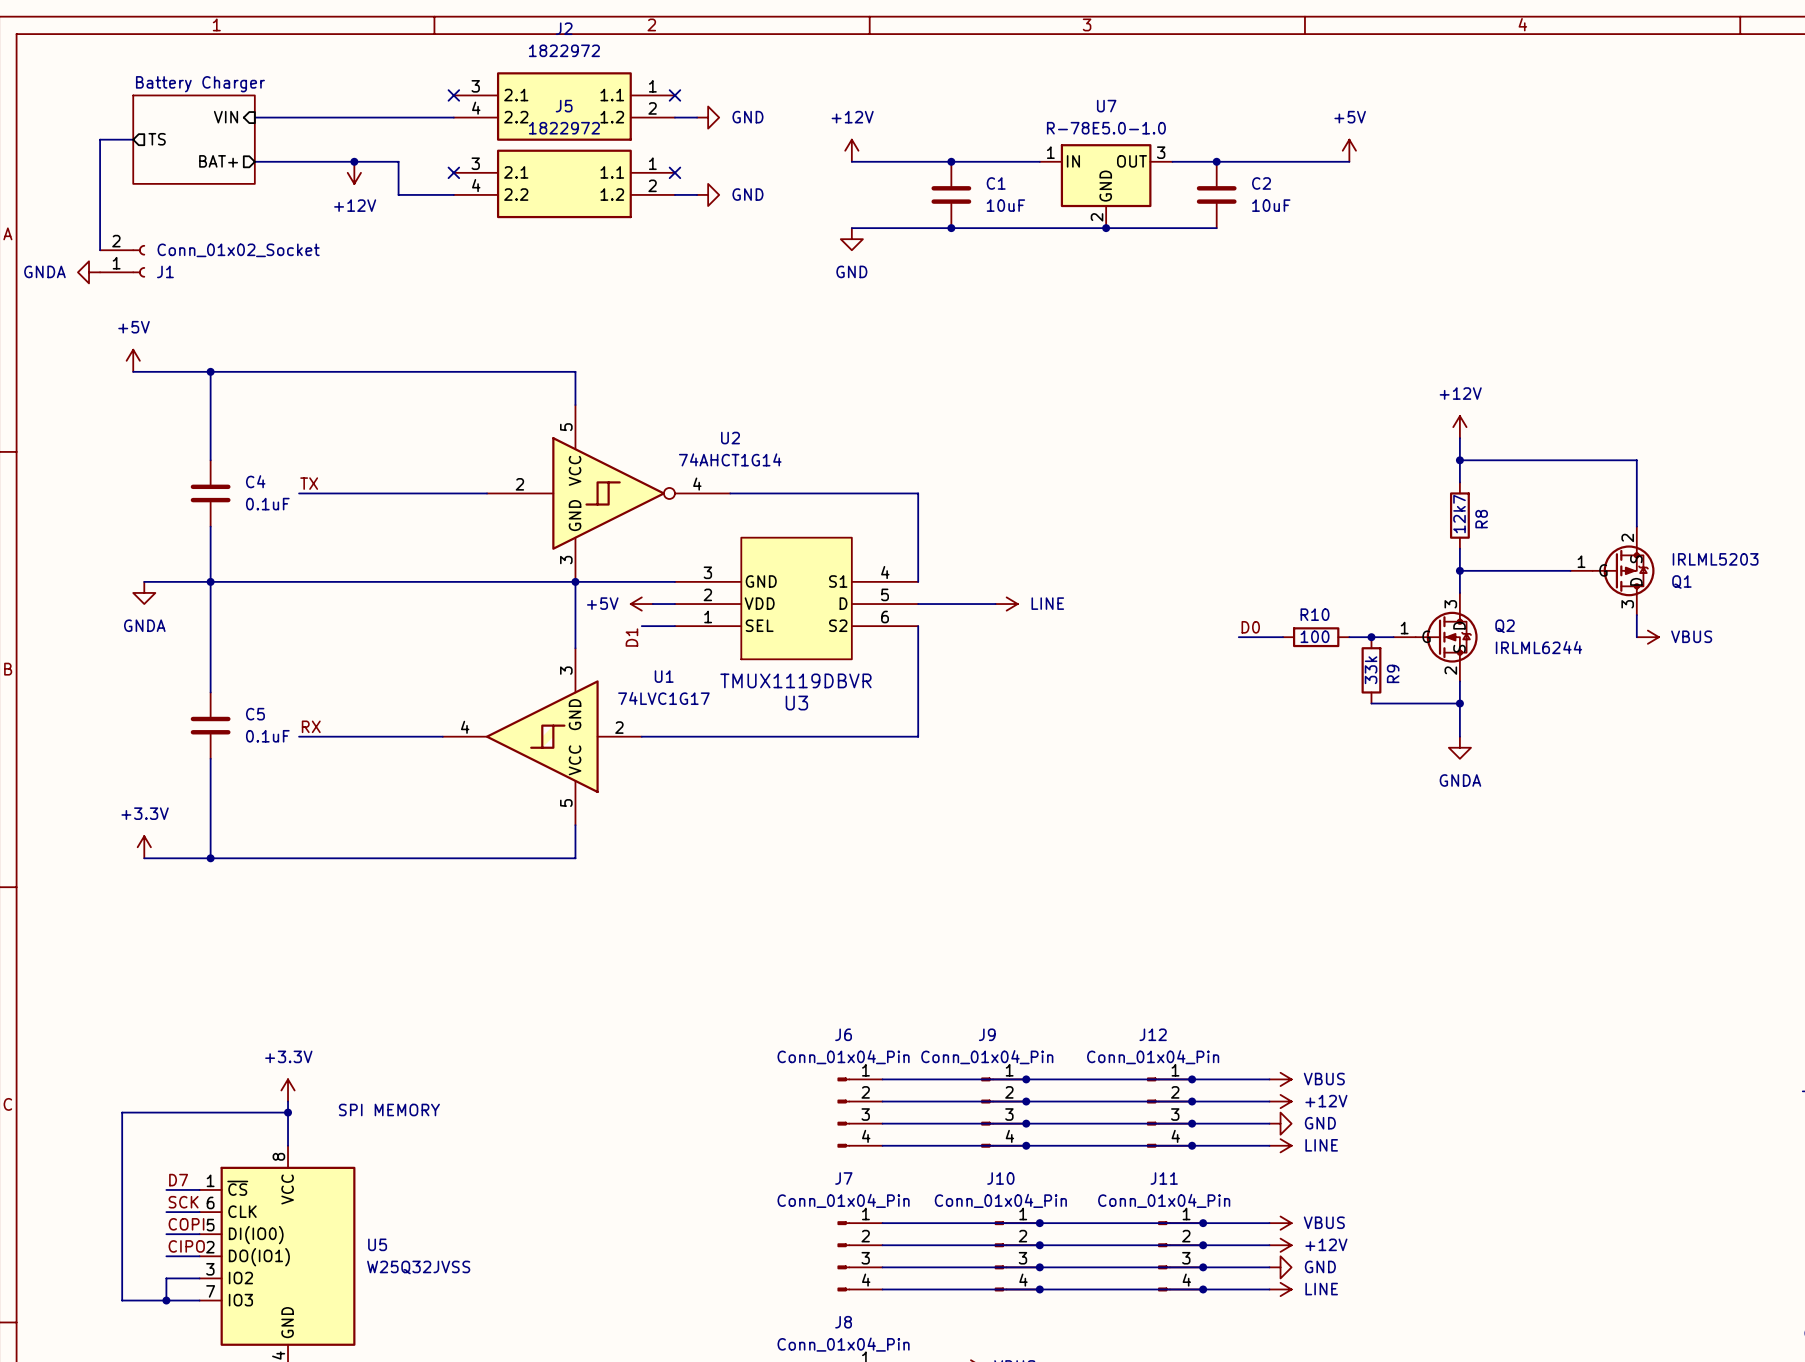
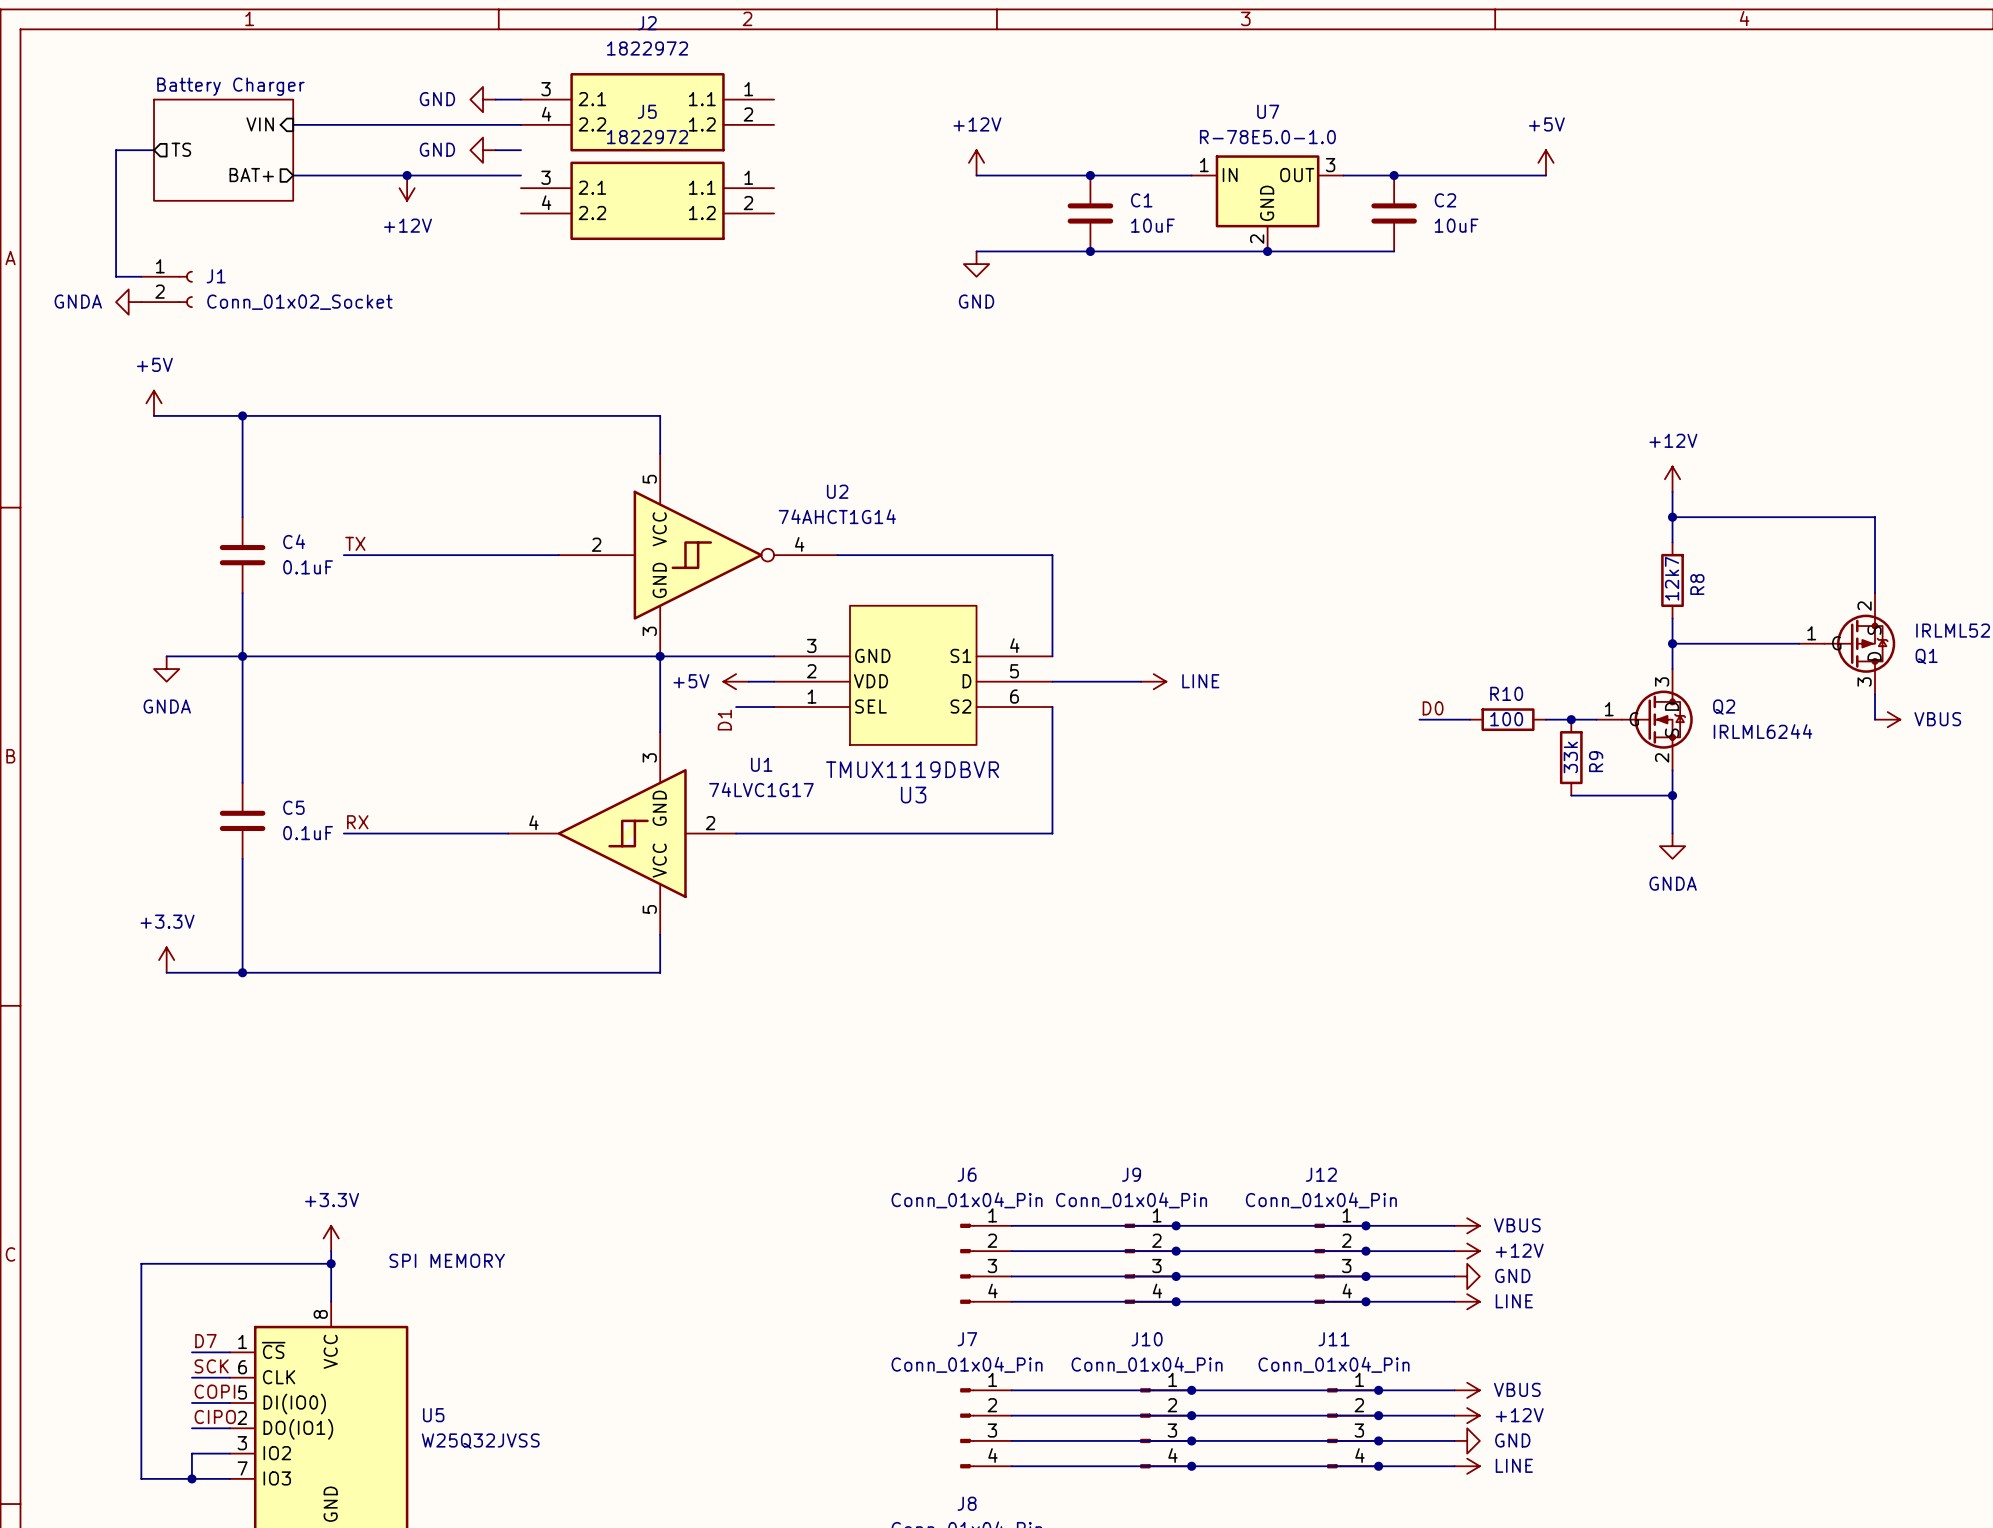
power symbol: none -> GND (483, 99)
wire: none -> (495, 99) (520, 99)
no-connect mark: (453, 95) -> none
no-connect mark: (674, 95) -> none
wire: (674, 117) (697, 117) -> none
power symbol: GND (708, 117) -> none
power symbol: none -> GND (483, 150)
wire: none -> (495, 150) (520, 150)
wire: (398, 161) (398, 194) (453, 194) -> (457, 175) (520, 175)
no-connect mark: (453, 172) -> none
no-connect mark: (674, 172) -> none
wire: (674, 194) (697, 194) -> none
power symbol: GND (708, 194) -> none
J1 flip: as is (138, 261) -> up-down (185, 289)
power symbol position: GNDA (89, 272) -> GNDA (128, 302)

